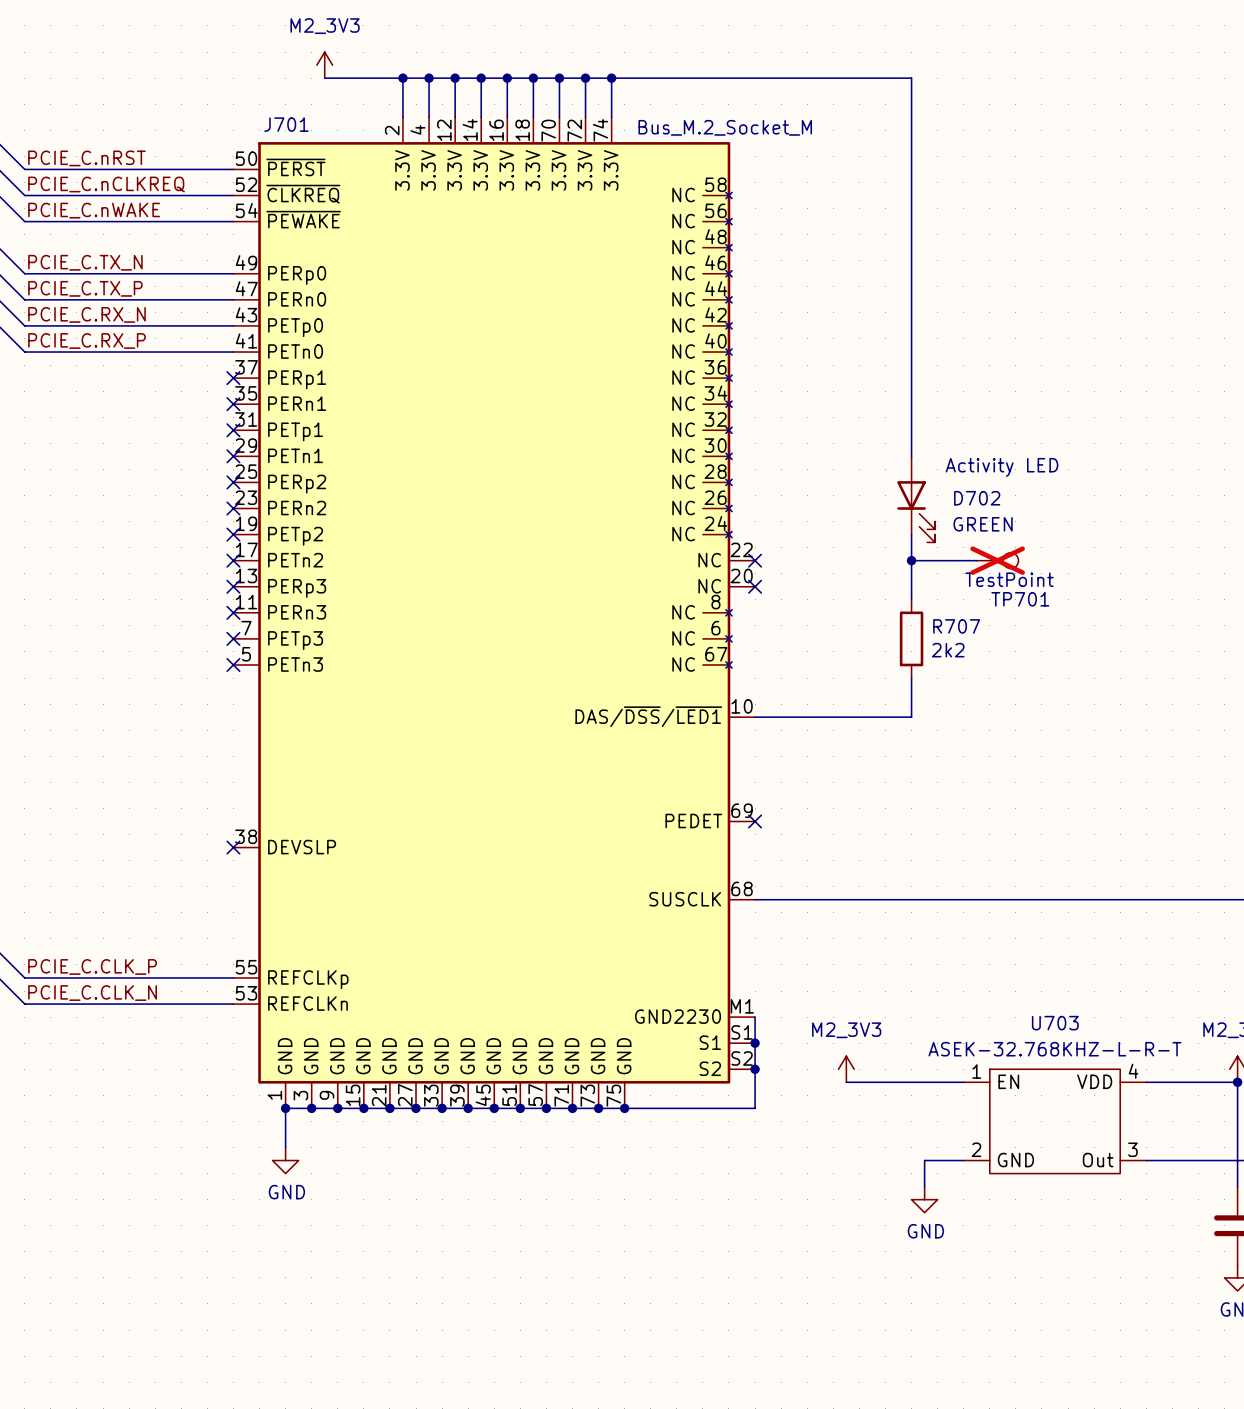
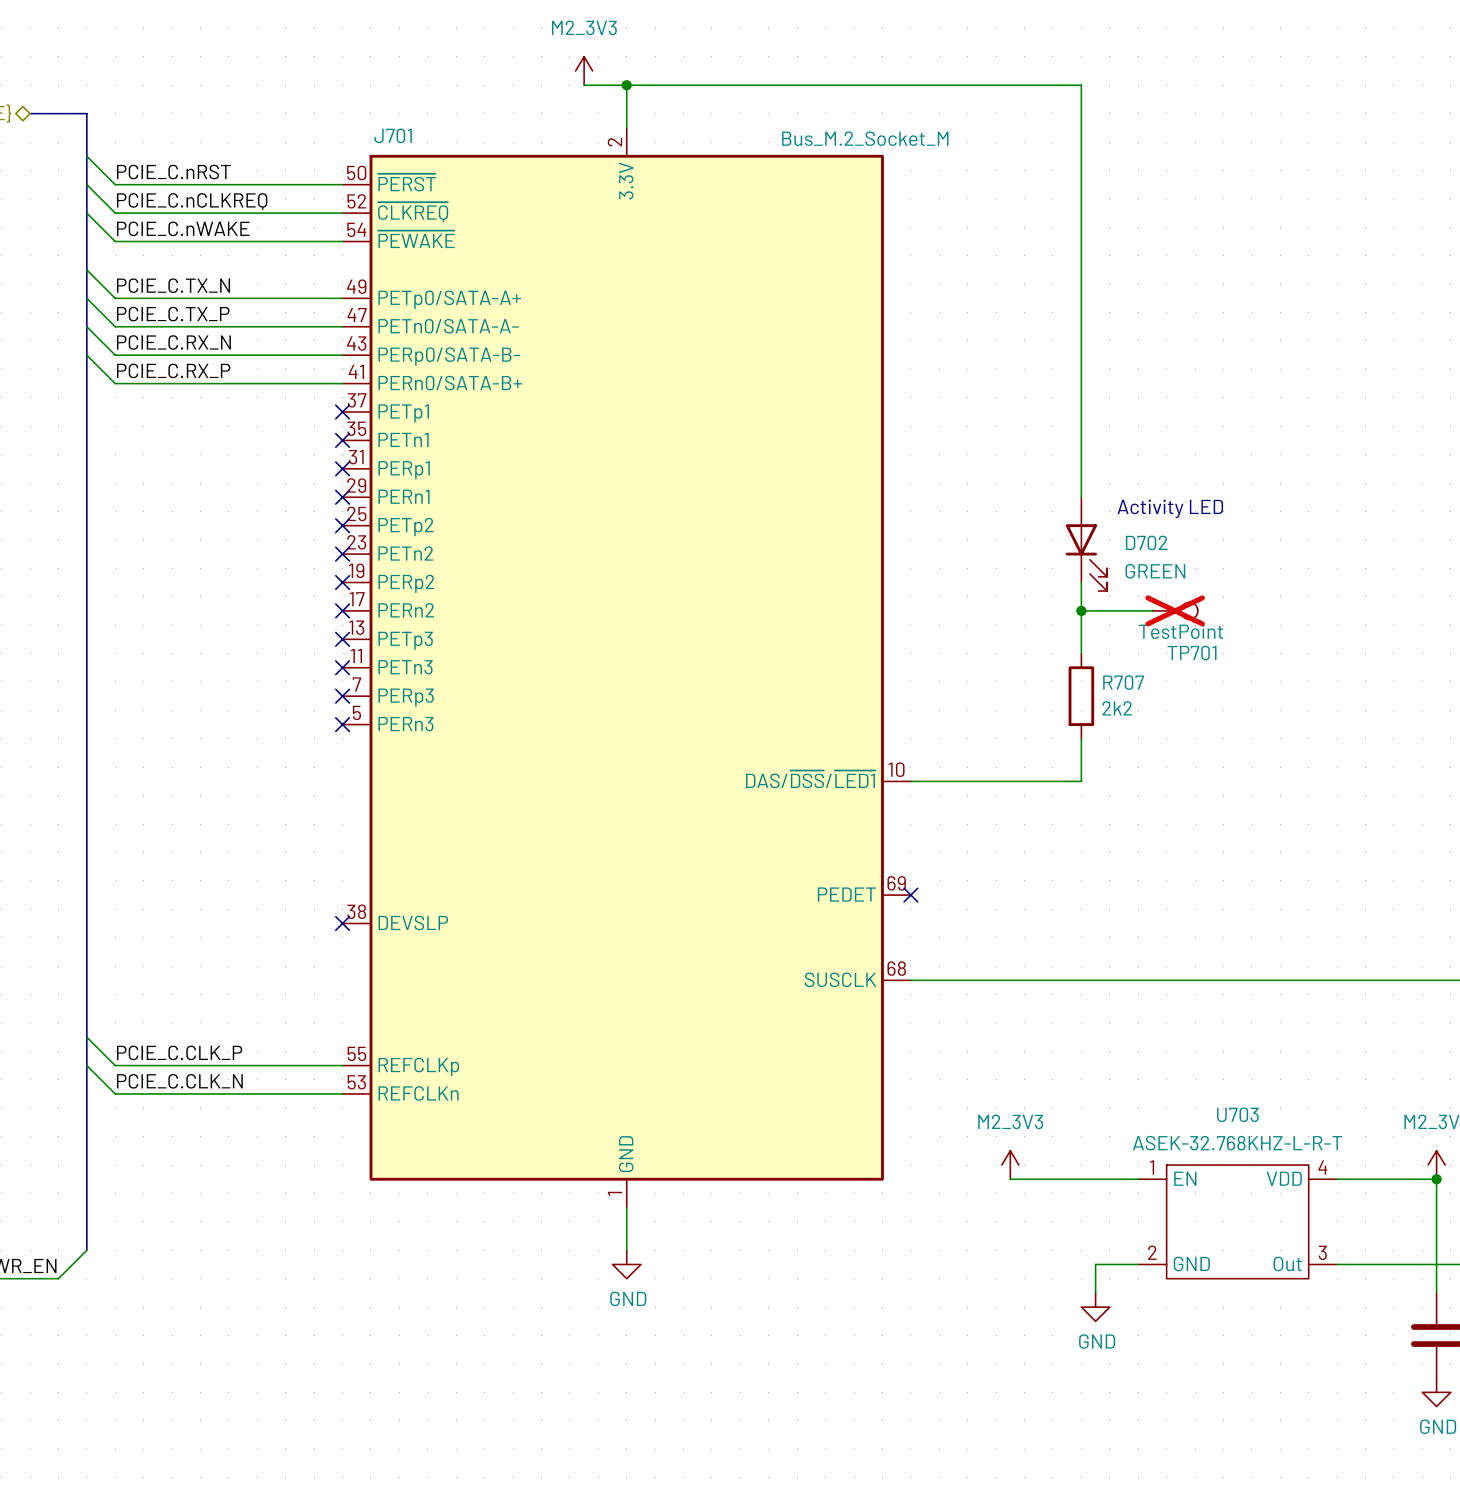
power symbol position: M2_3V3 (324, 65) -> M2_3V3 (584, 71)
wire: (324, 78) (455, 78) (455, 117) -> none
wire: (402, 78) (402, 117) -> none
junction: (402, 78) -> none
wire: (429, 78) (429, 117) -> none
junction: (429, 78) -> none
junction: (455, 78) -> none
wire: (481, 78) (481, 117) -> (626, 85) (626, 127)
junction: (481, 78) -> none
junction: none -> (626, 85)
wire: (507, 78) (507, 117) -> none
junction: (507, 78) -> none
wire: (533, 78) (533, 117) -> none
junction: (533, 78) -> none
wire: (559, 78) (559, 117) -> none
junction: (559, 78) -> none
wire: (585, 78) (585, 117) -> none
junction: (585, 78) -> none
wire: (611, 78) (611, 117) -> none
junction: (611, 78) -> none
J701 symbol: [233, 117, 756, 1109] -> [342, 127, 911, 1208]
no-connect mark: (755, 560) -> none
no-connect mark: (755, 586) -> none
wire: (755, 1017) (755, 1108) (285, 1108) (285, 1147) -> none
junction: (755, 1043) -> none
junction: (755, 1069) -> none
junction: (285, 1108) -> none
junction: (311, 1108) -> none
junction: (337, 1108) -> none
junction: (363, 1108) -> none
junction: (389, 1108) -> none
junction: (416, 1108) -> none
junction: (442, 1108) -> none
junction: (468, 1108) -> none
wire: none -> (626, 1207) (626, 1250)
junction: (494, 1108) -> none
junction: (520, 1108) -> none
junction: (546, 1108) -> none
junction: (572, 1108) -> none
junction: (598, 1108) -> none
junction: (624, 1108) -> none
power symbol position: GND (285, 1160) -> GND (626, 1264)

